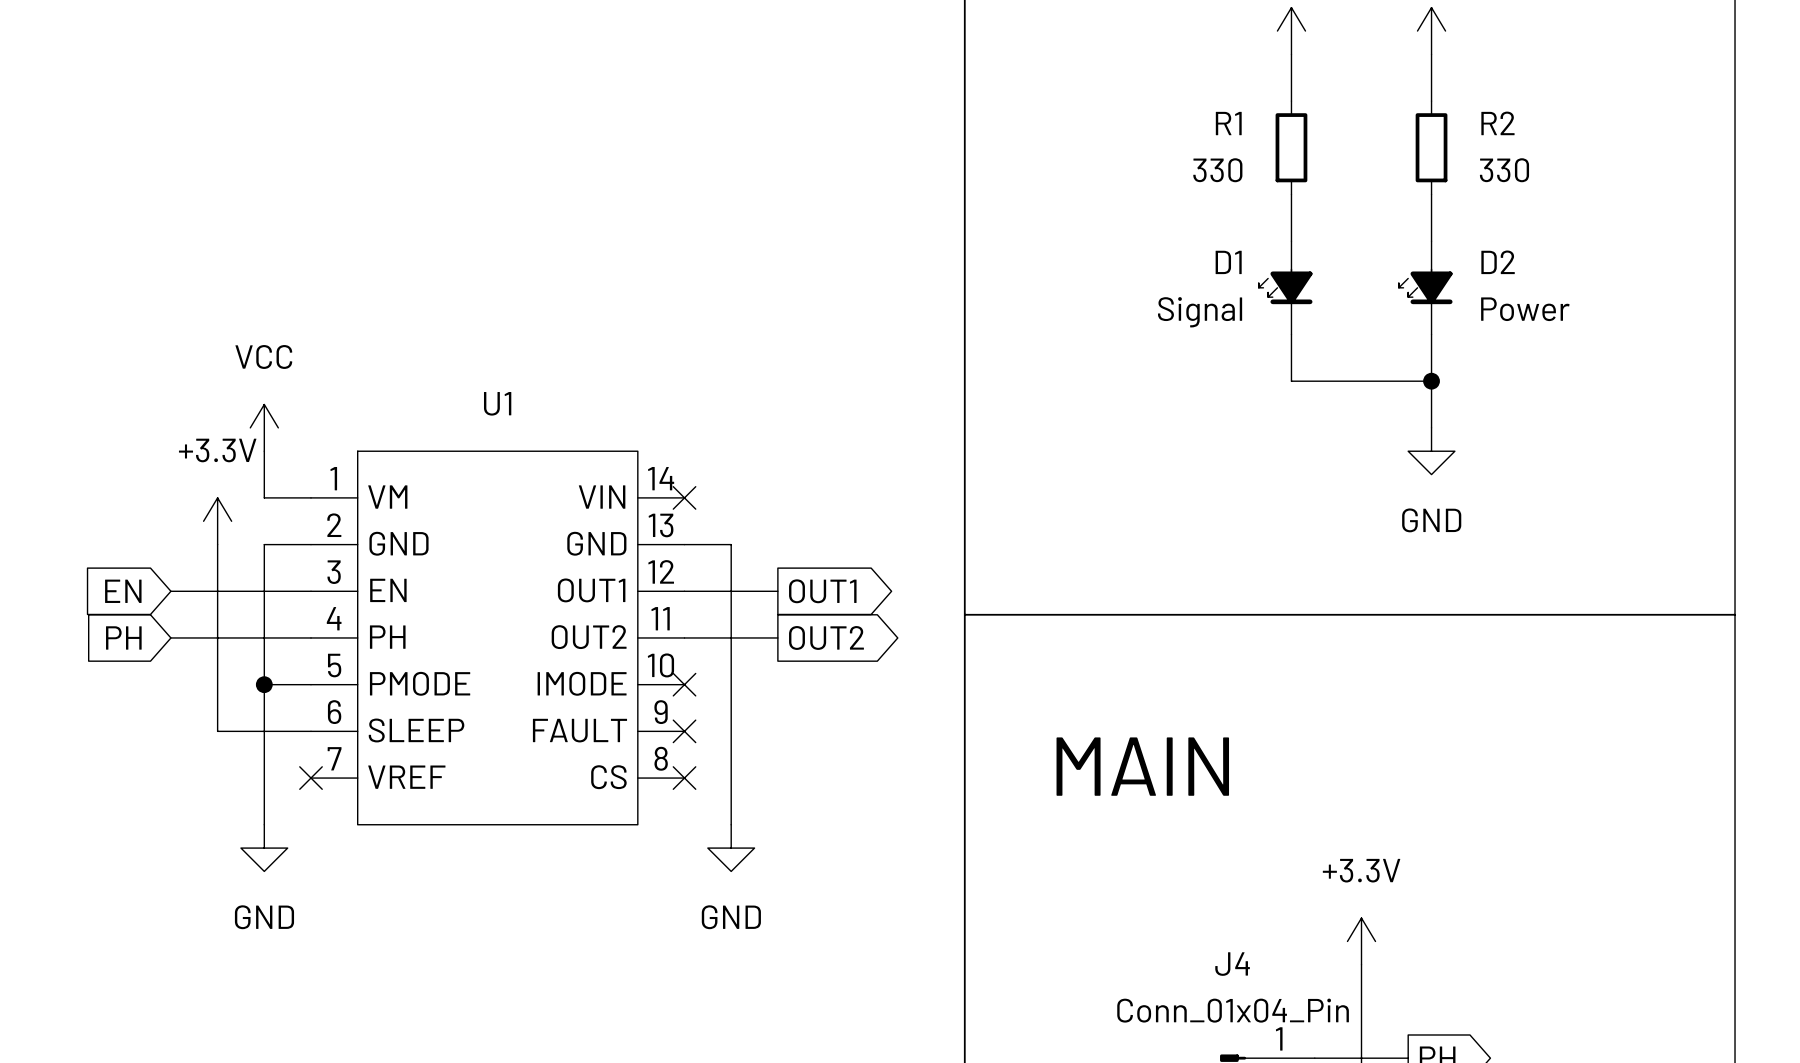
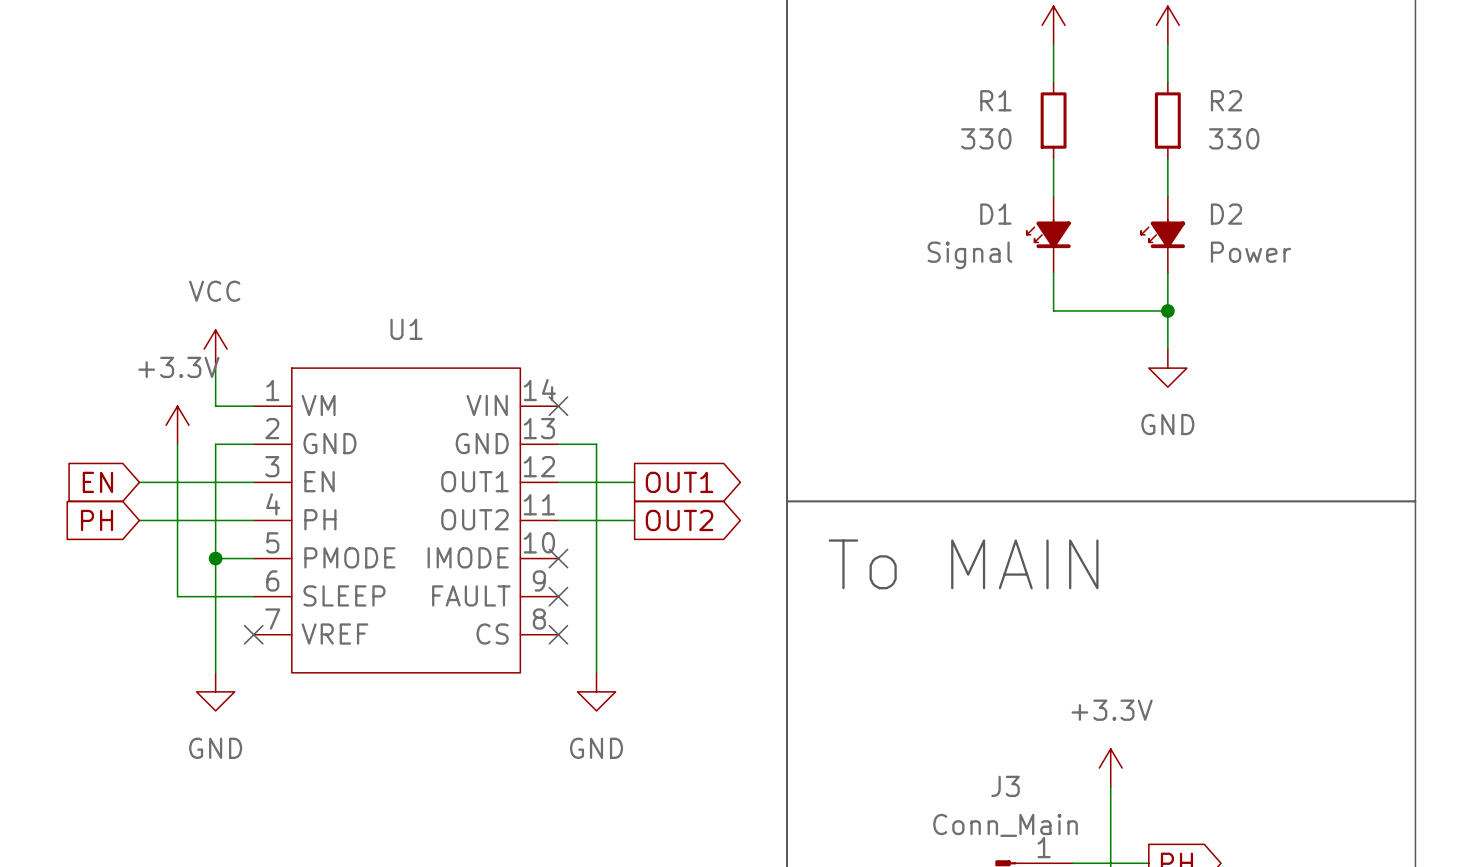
text: MAIN (1142, 766) -> To MAIN (963, 564)
J4 name: J4 (1232, 964) -> J3 (1005, 786)
J4 value: Conn_01x04_Pin (1233, 1010) -> Conn_Main (1005, 825)

